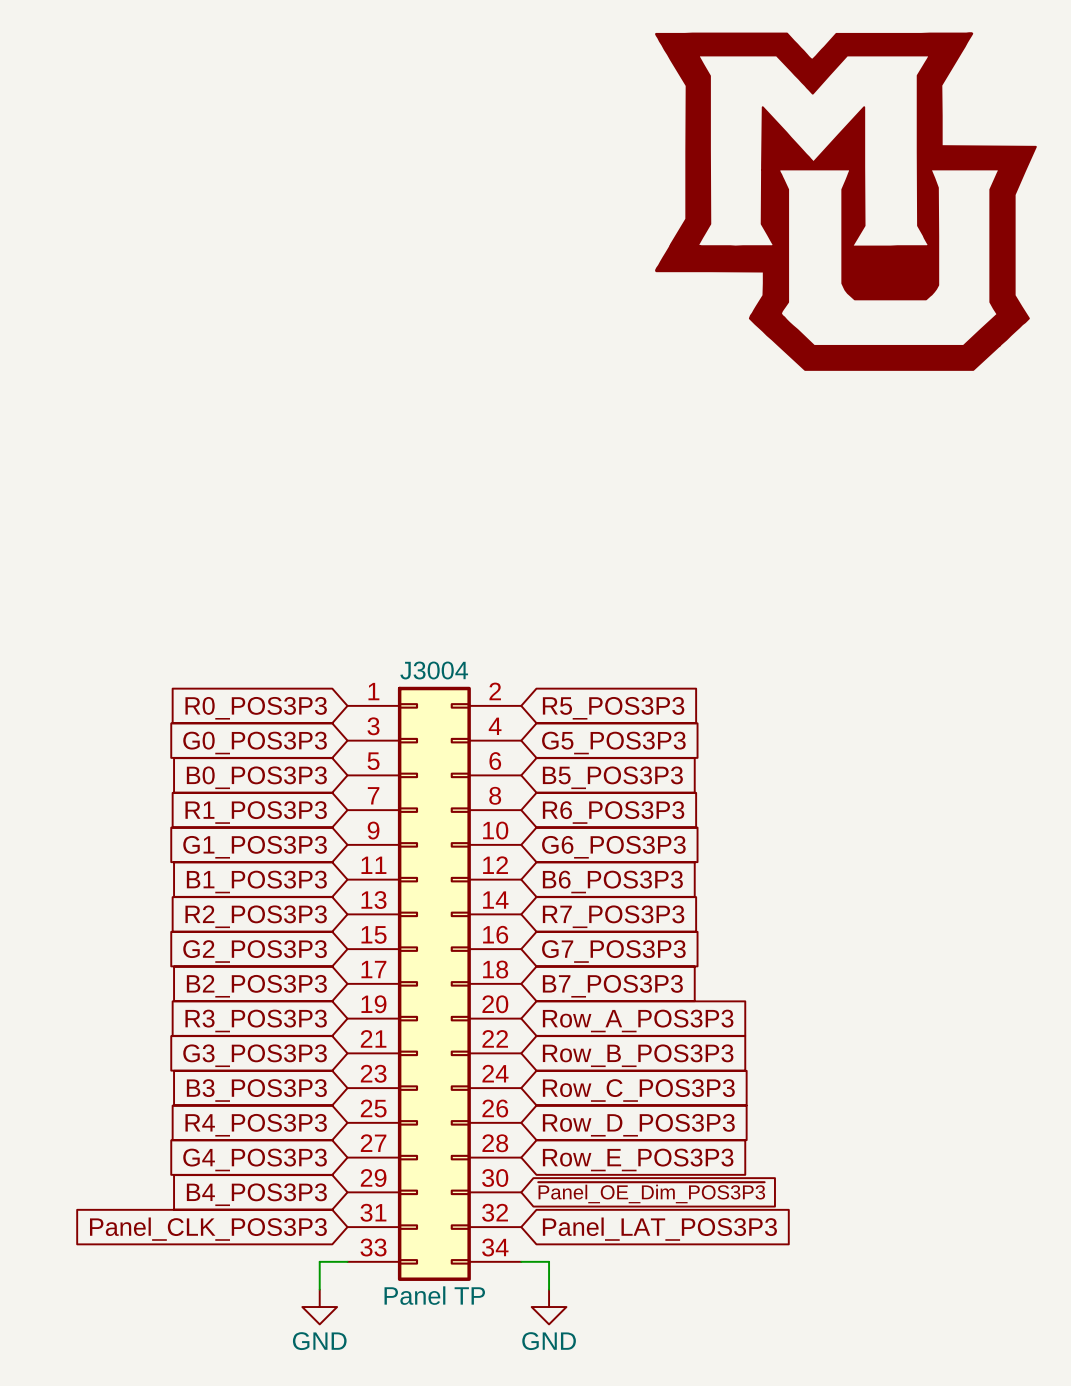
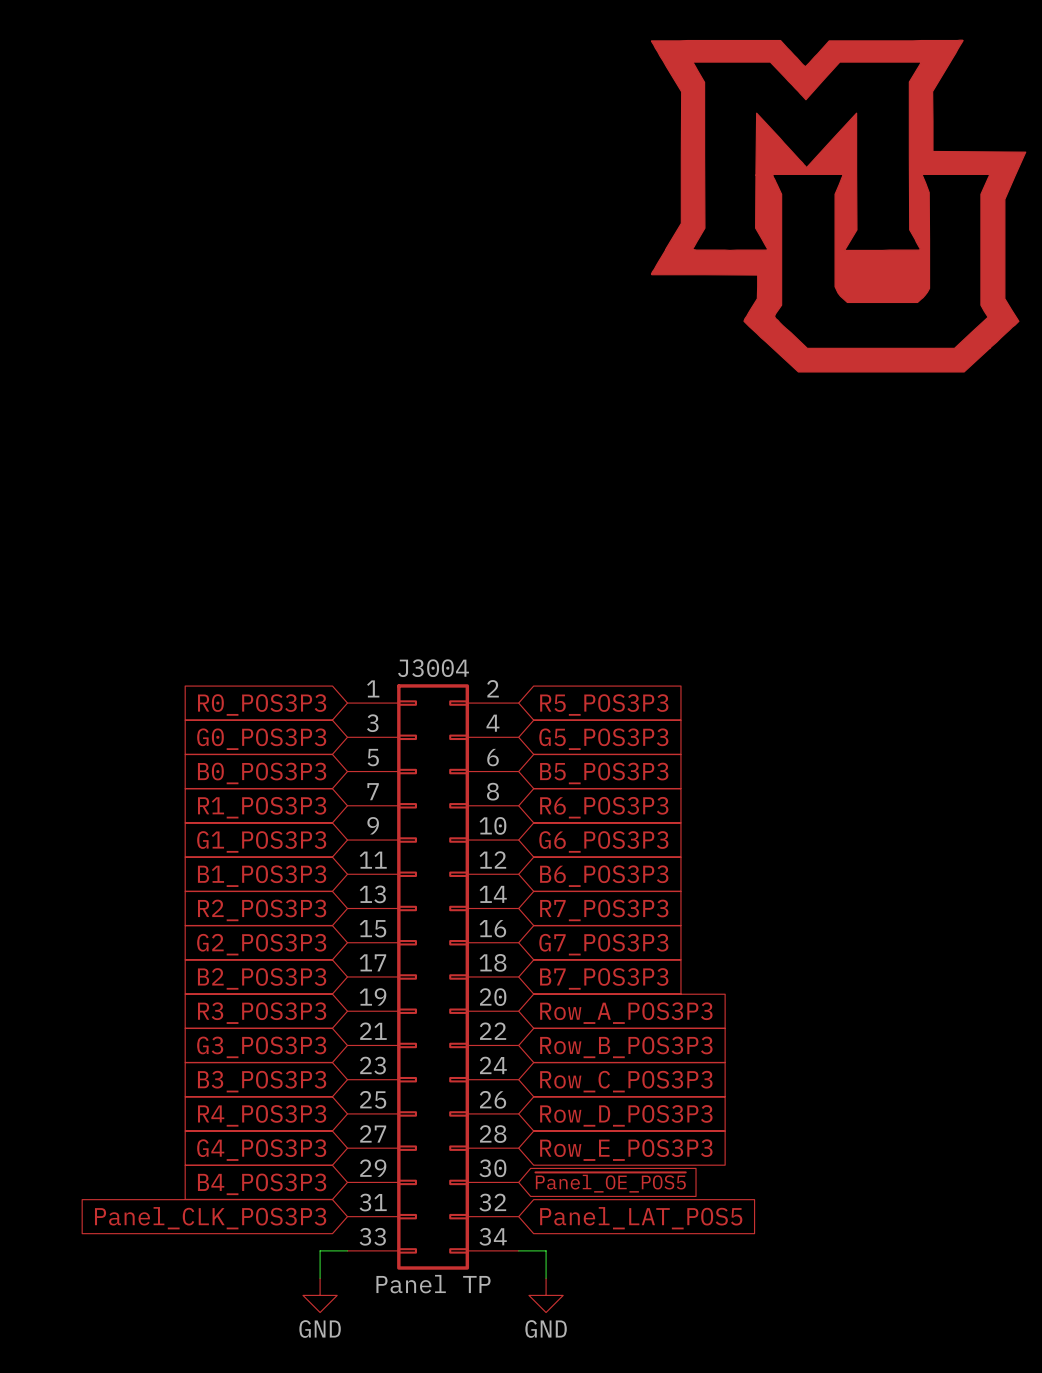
global label: ~{Panel_OE_Dim_POS3P3} (651, 1192) -> ~{Panel_OE_POS5} (610, 1182)
global label: Panel_LAT_POS3P3 (659, 1229) -> Panel_LAT_POS5 (641, 1218)

